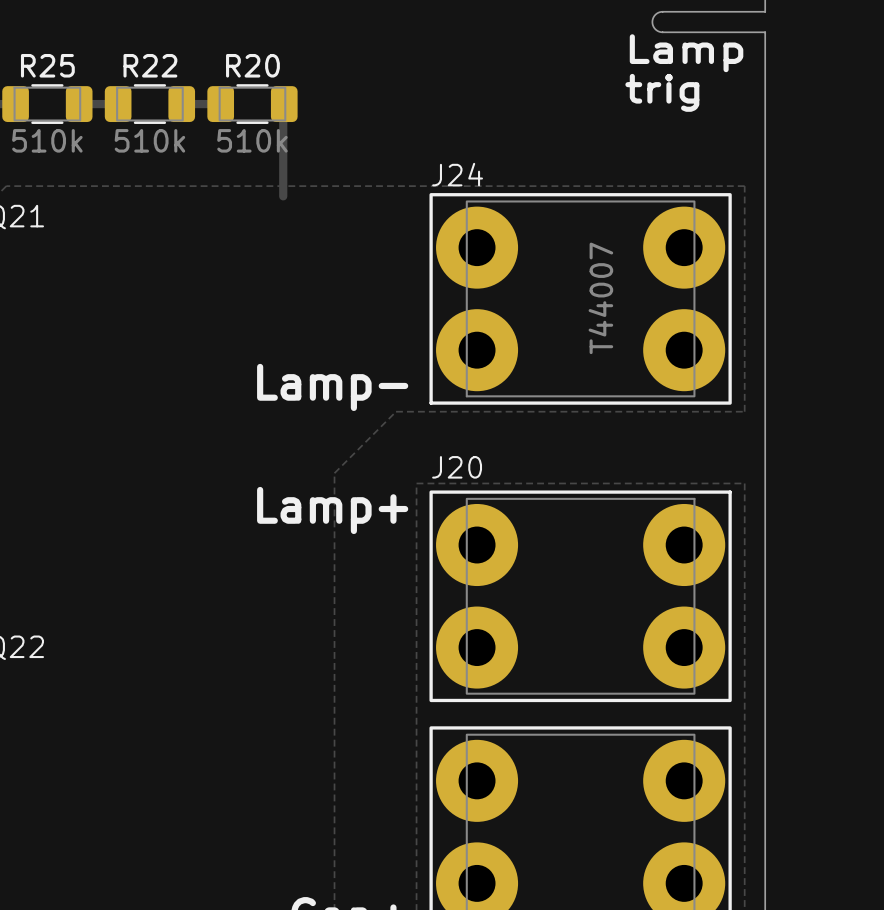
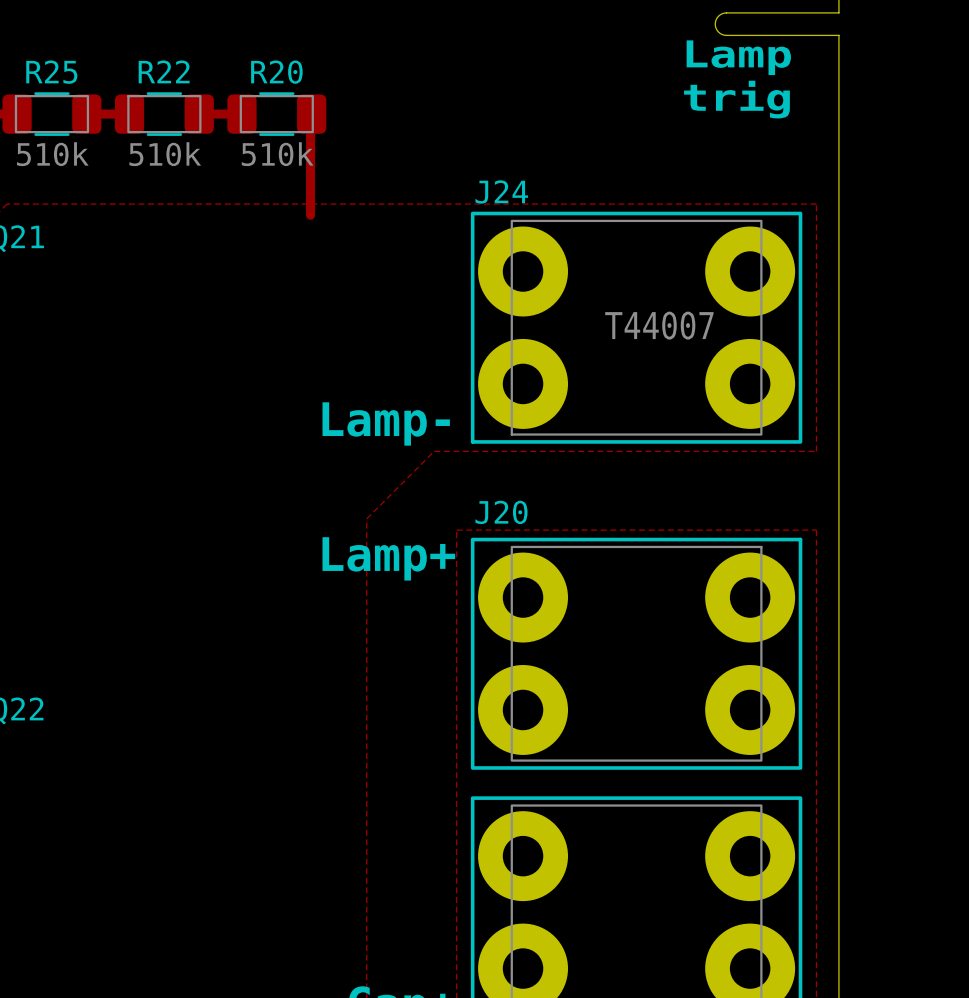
J24 value rotation: 0° (600, 298) -> 90° clockwise (659, 325)

